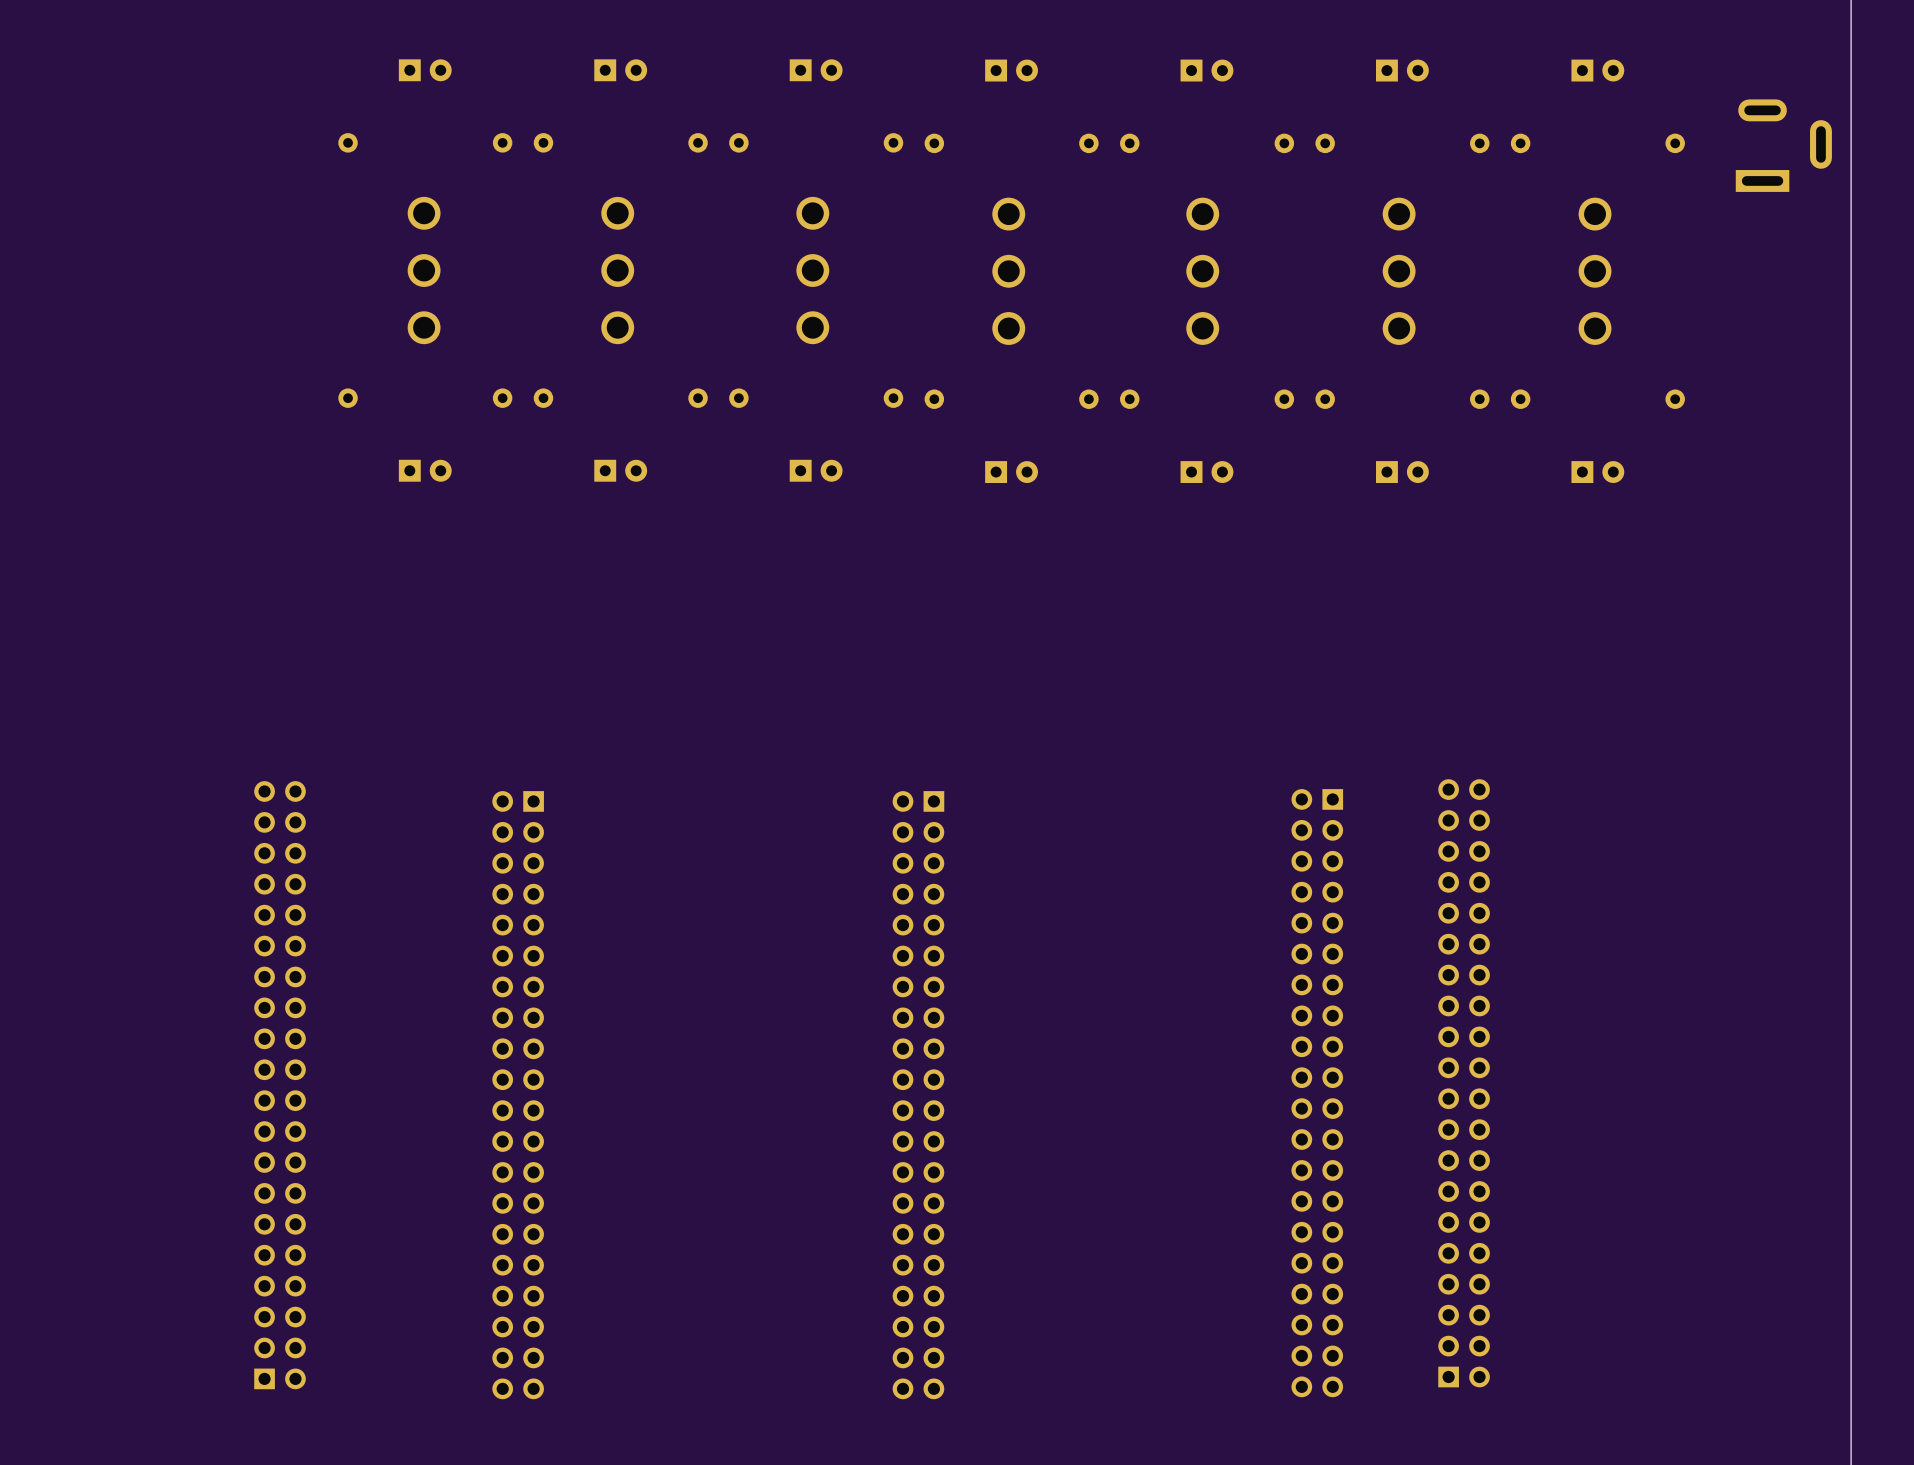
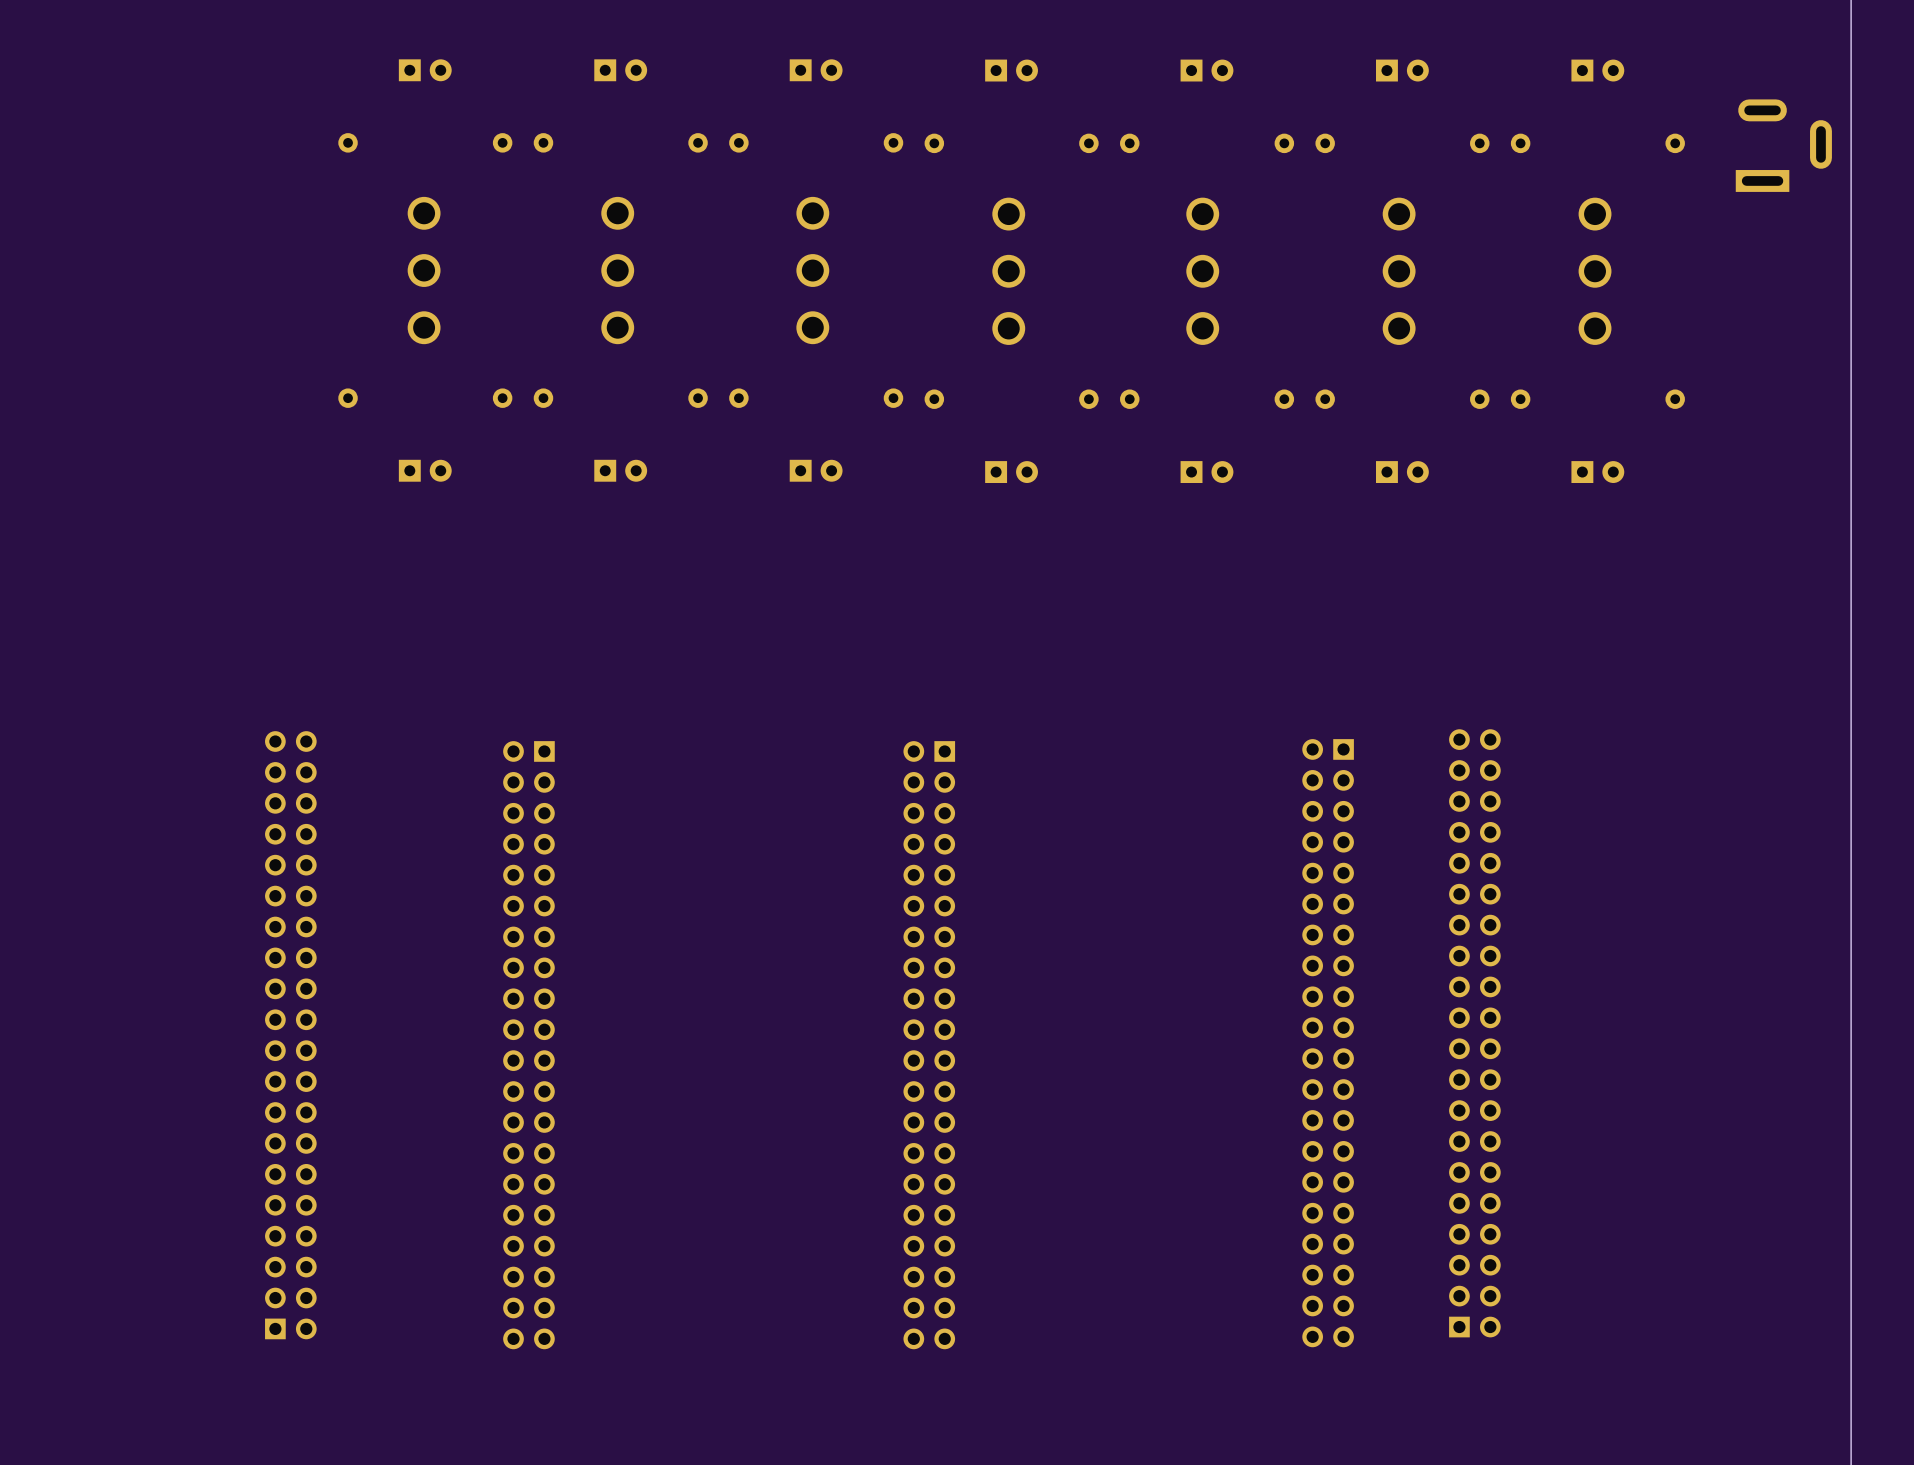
part position: (1464, 1083) -> (1474, 1033)
part position: (280, 1085) -> (290, 1035)
part position: (1317, 1093) -> (1328, 1043)
part position: (518, 1095) -> (528, 1045)
part position: (918, 1095) -> (929, 1045)

